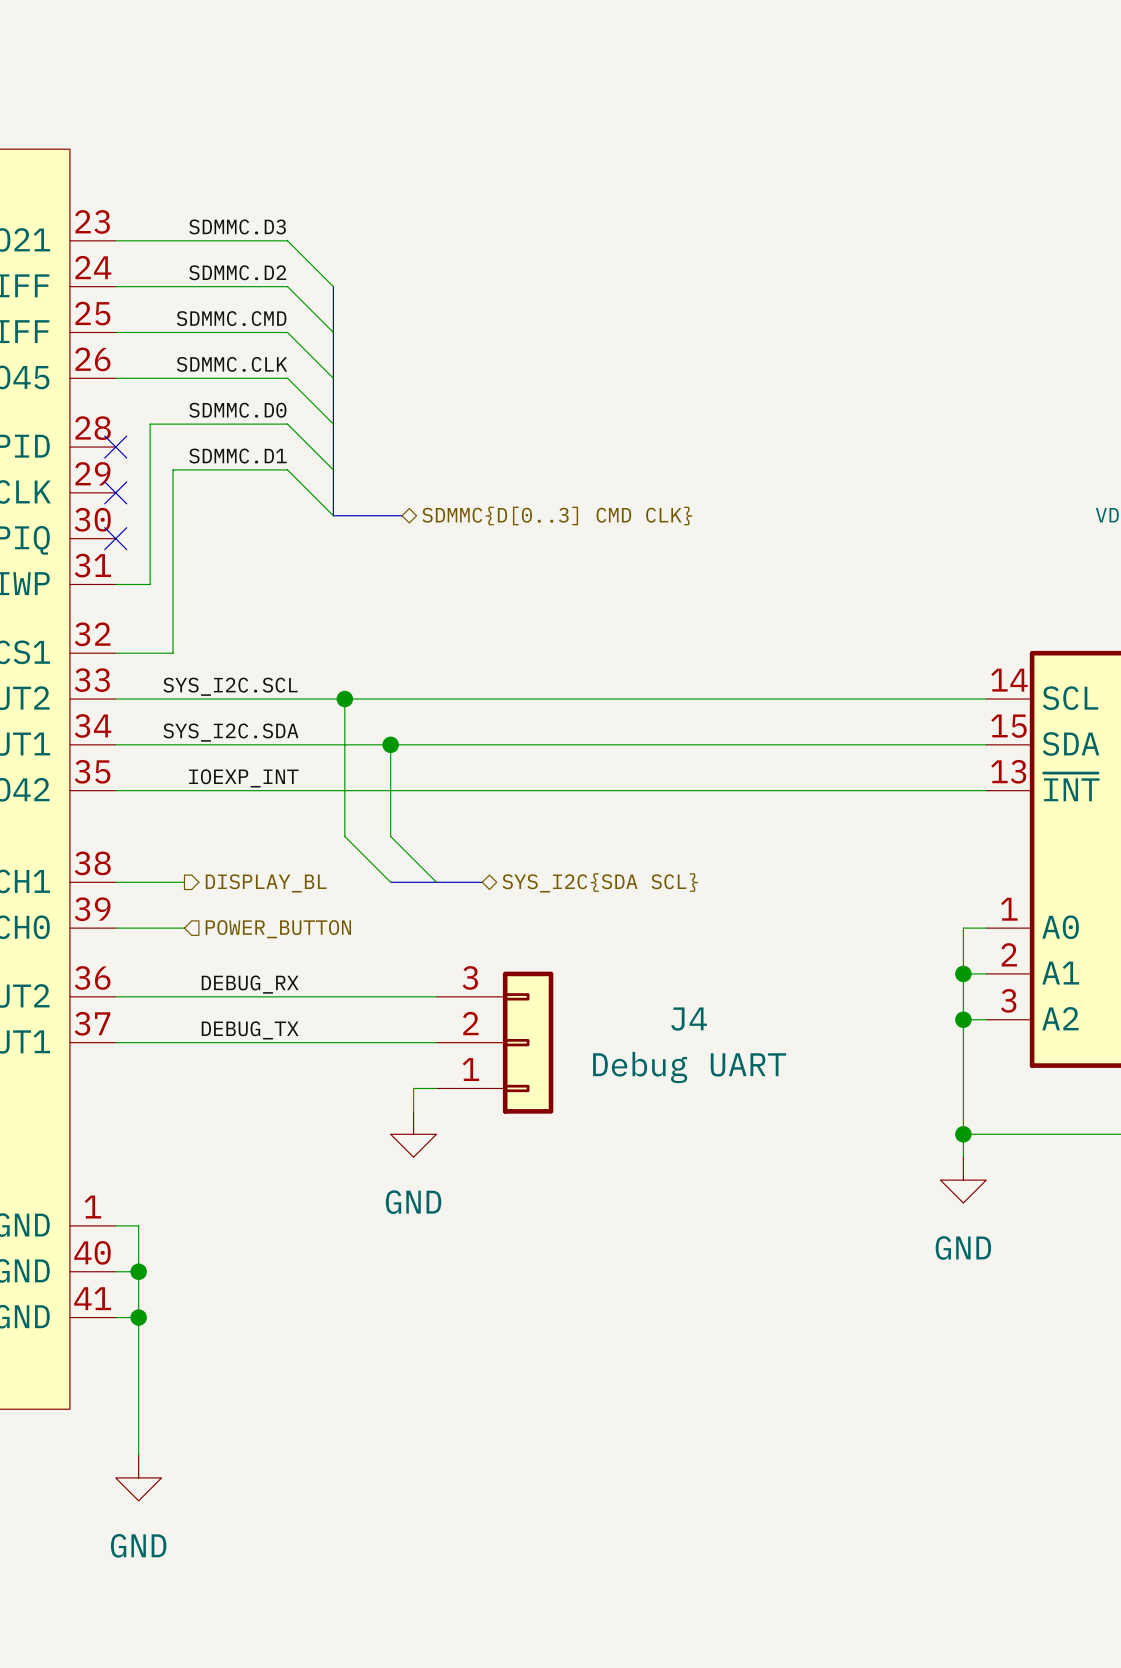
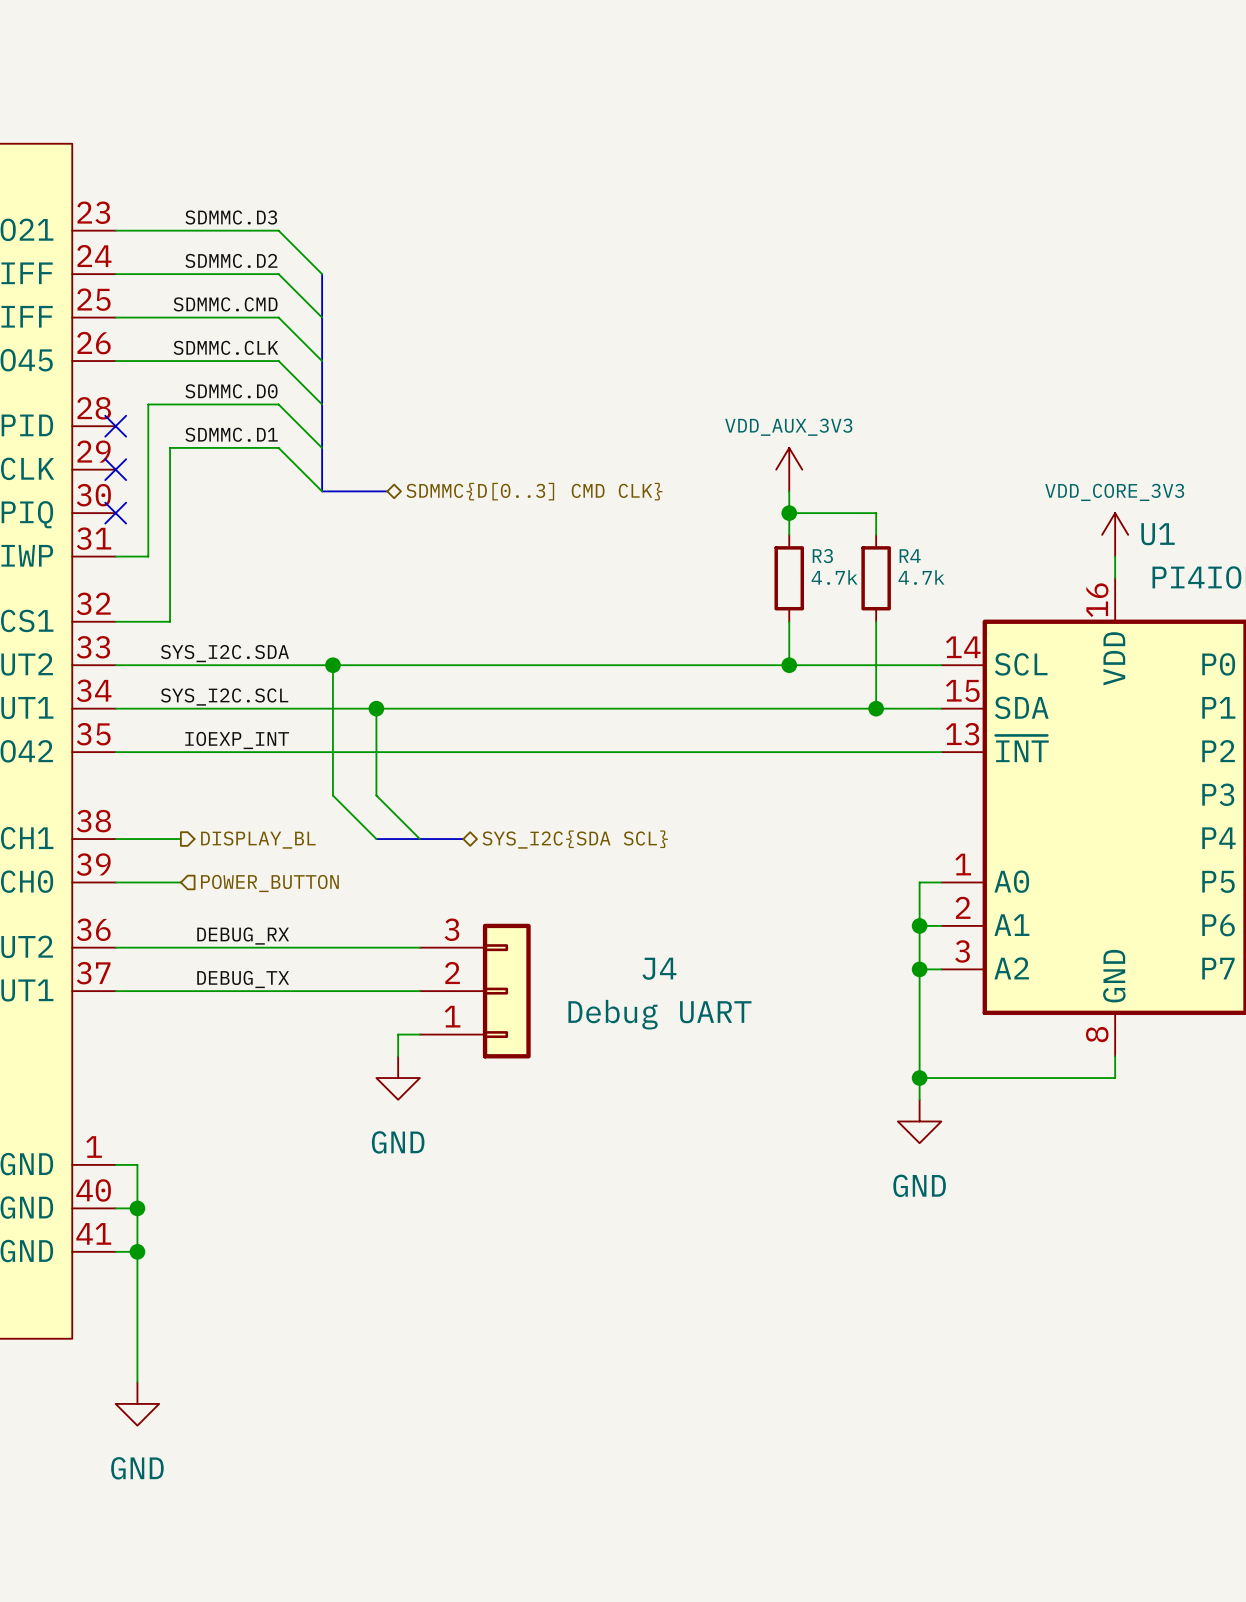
power symbol: none -> VDD_AUX_3V3 (789, 469)
wire: none -> (789, 491) (789, 534)
wire: none -> (789, 513) (876, 513) (876, 534)
junction: none -> (789, 513)
R3: none -> 4.7k (789, 578)
R4: none -> 4.7k (876, 578)
wire: none -> (789, 621) (789, 665)
wire: none -> (876, 621) (876, 708)
label: SYS_I2C.SCL (230, 686) -> SYS_I2C.SDA (224, 653)
junction: none -> (789, 665)
label: SYS_I2C.SDA (230, 732) -> SYS_I2C.SCL (224, 697)
junction: none -> (876, 708)

